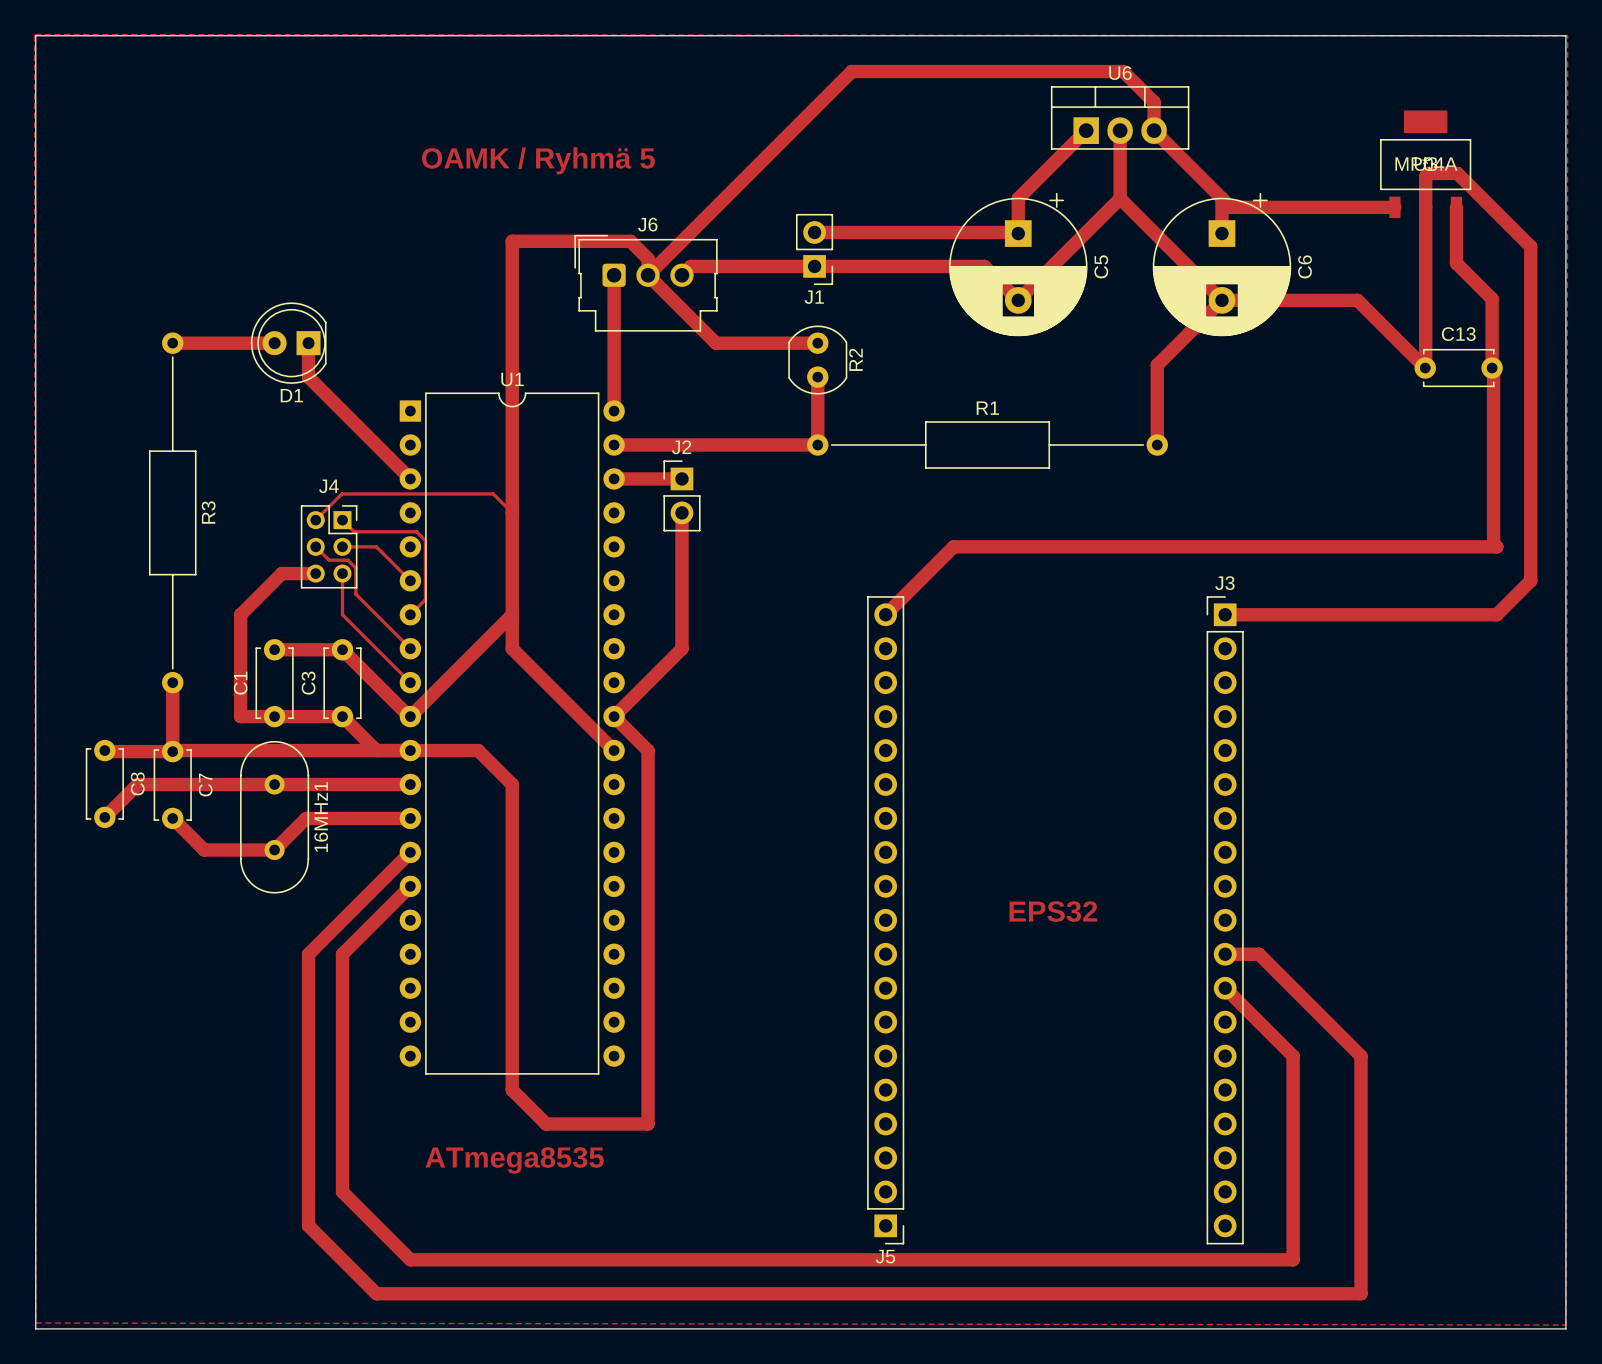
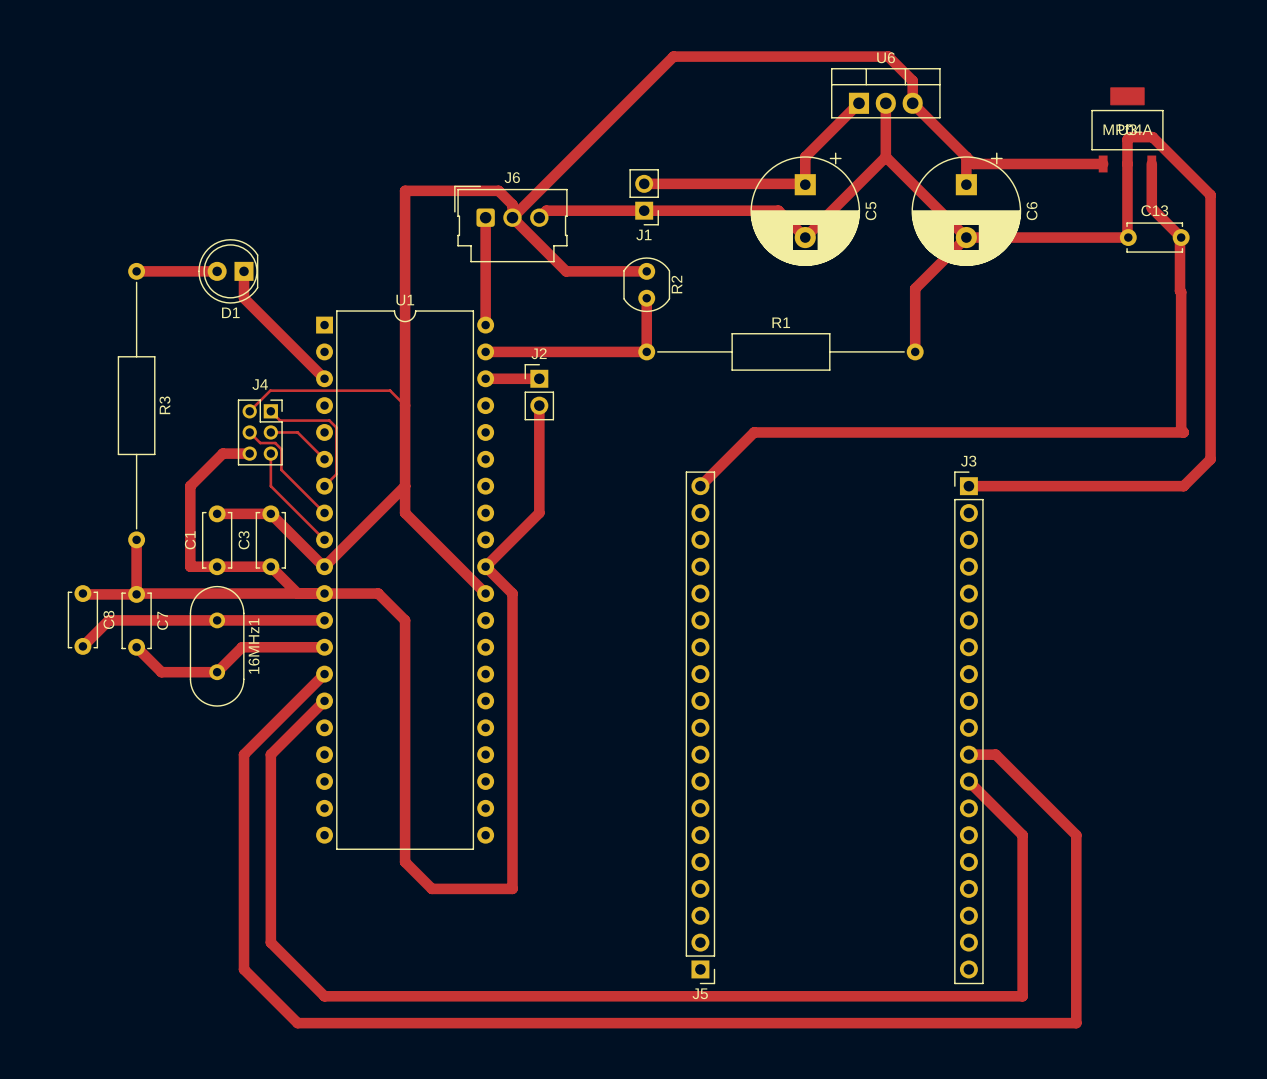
zone outline: (35, 34) (1567, 35) (1566, 1325) (35, 1323) (35, 34) -> none
board edge: (35, 35) (1565, 35) (1565, 1328) (35, 1328) (35, 35) -> none
text: OAMK / Ryhmä 5 (538, 160) -> none
track: (1425, 299) (1425, 368) (1357, 300) -> (1127, 236) (1073, 237)
C13 position: (1458, 368) -> (1154, 237)
text: EPS32 (1053, 911) -> none
text: ATmega8535 (514, 1160) -> none

